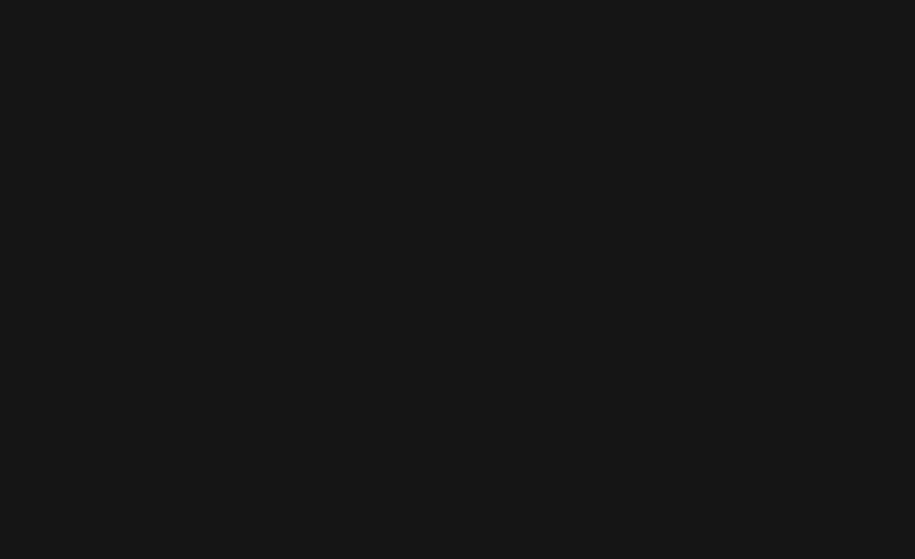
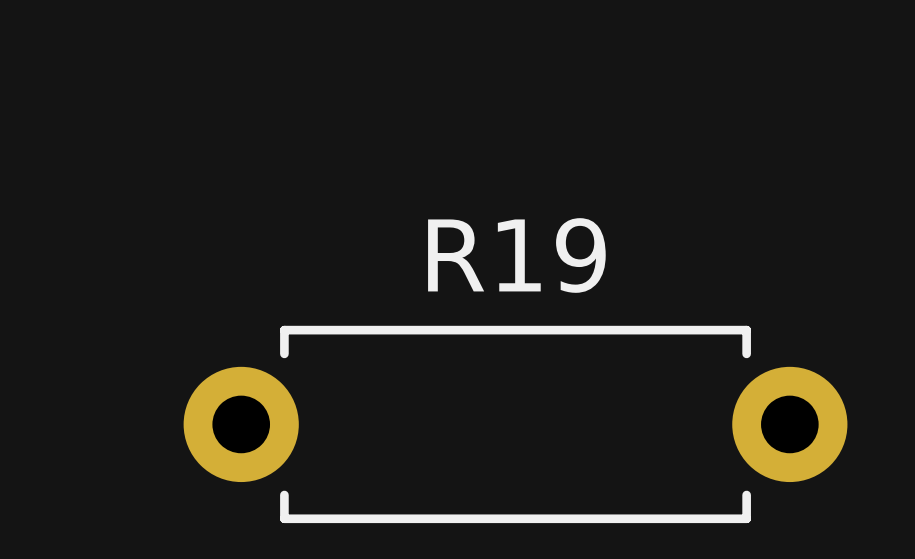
R19: none -> (515, 424)

